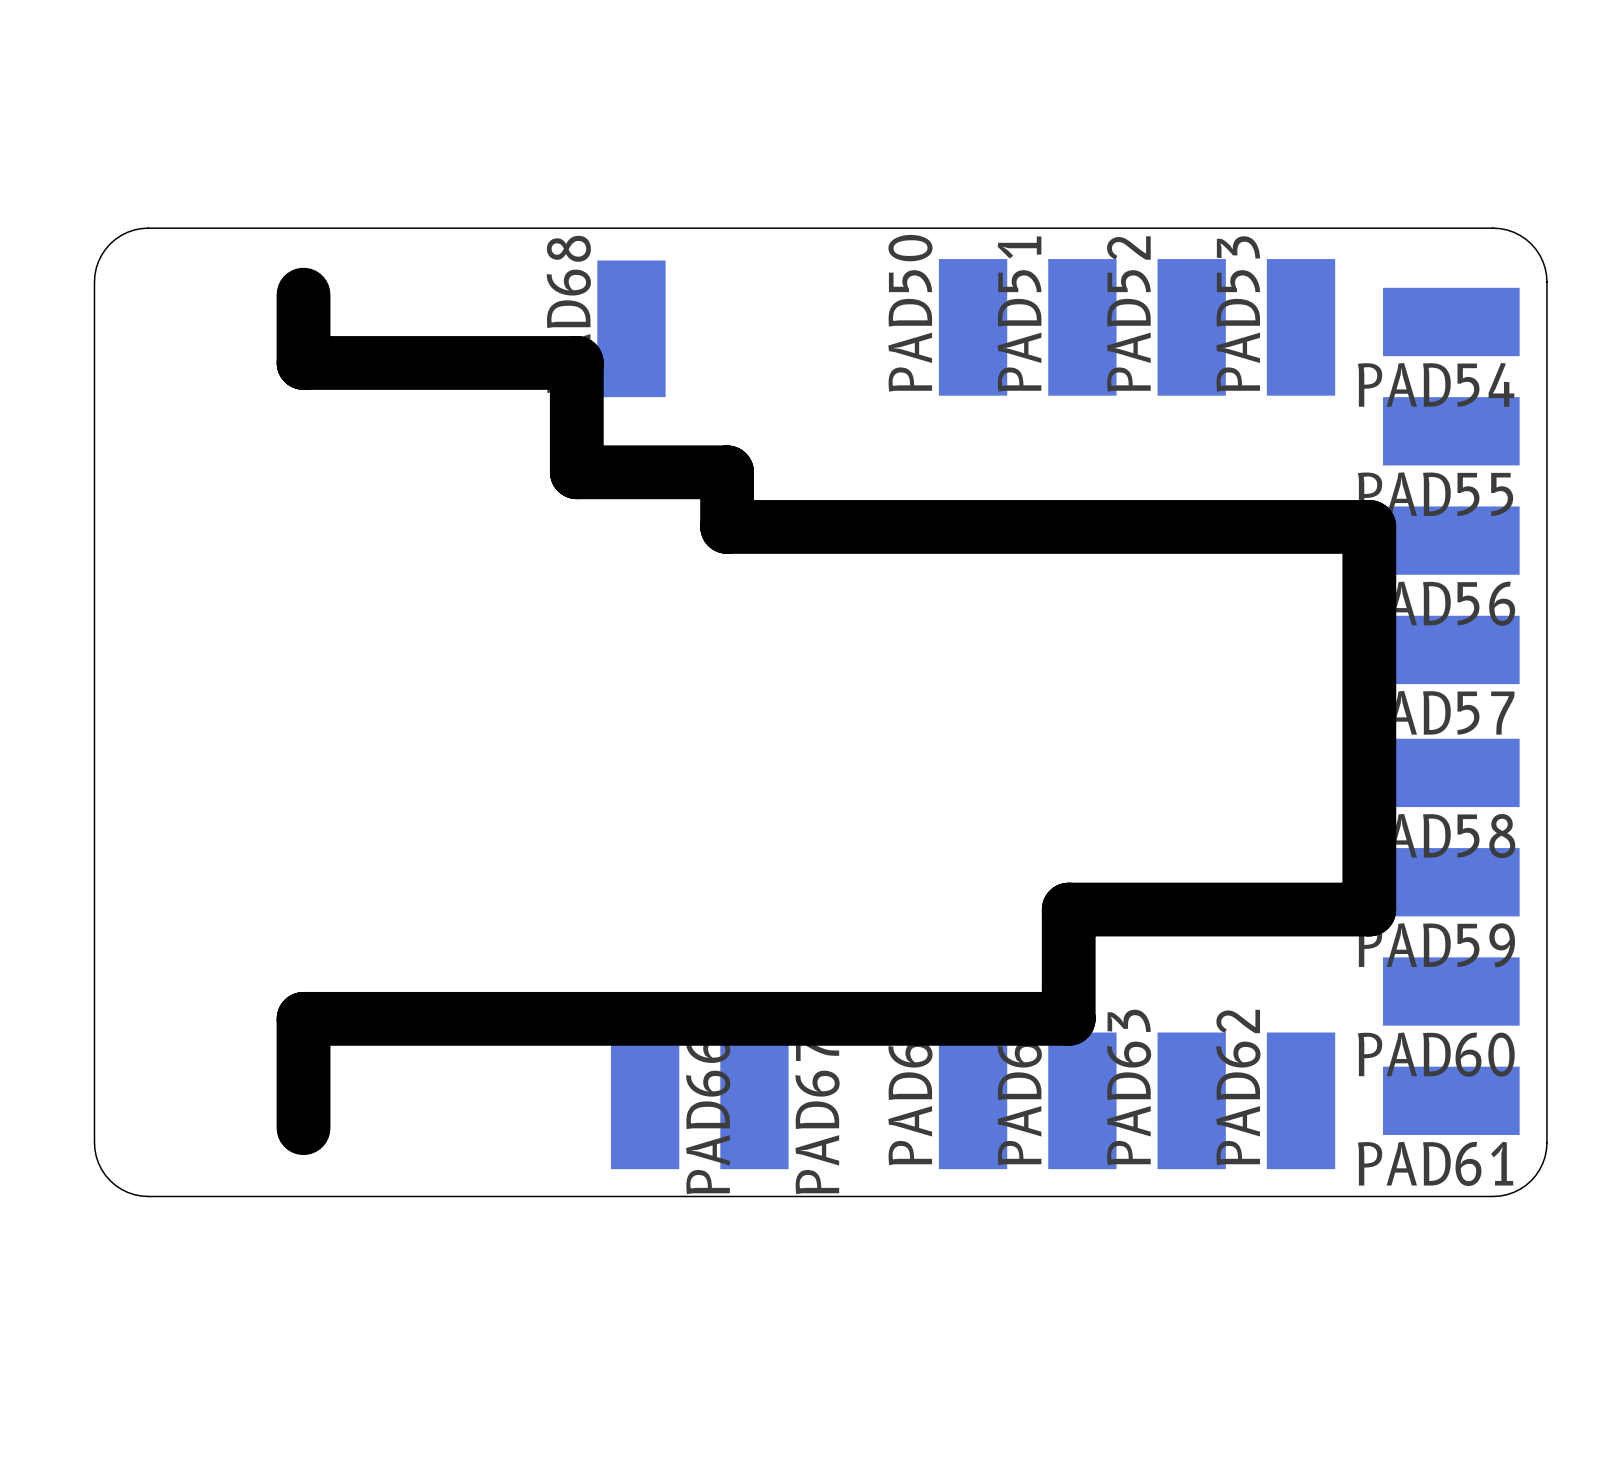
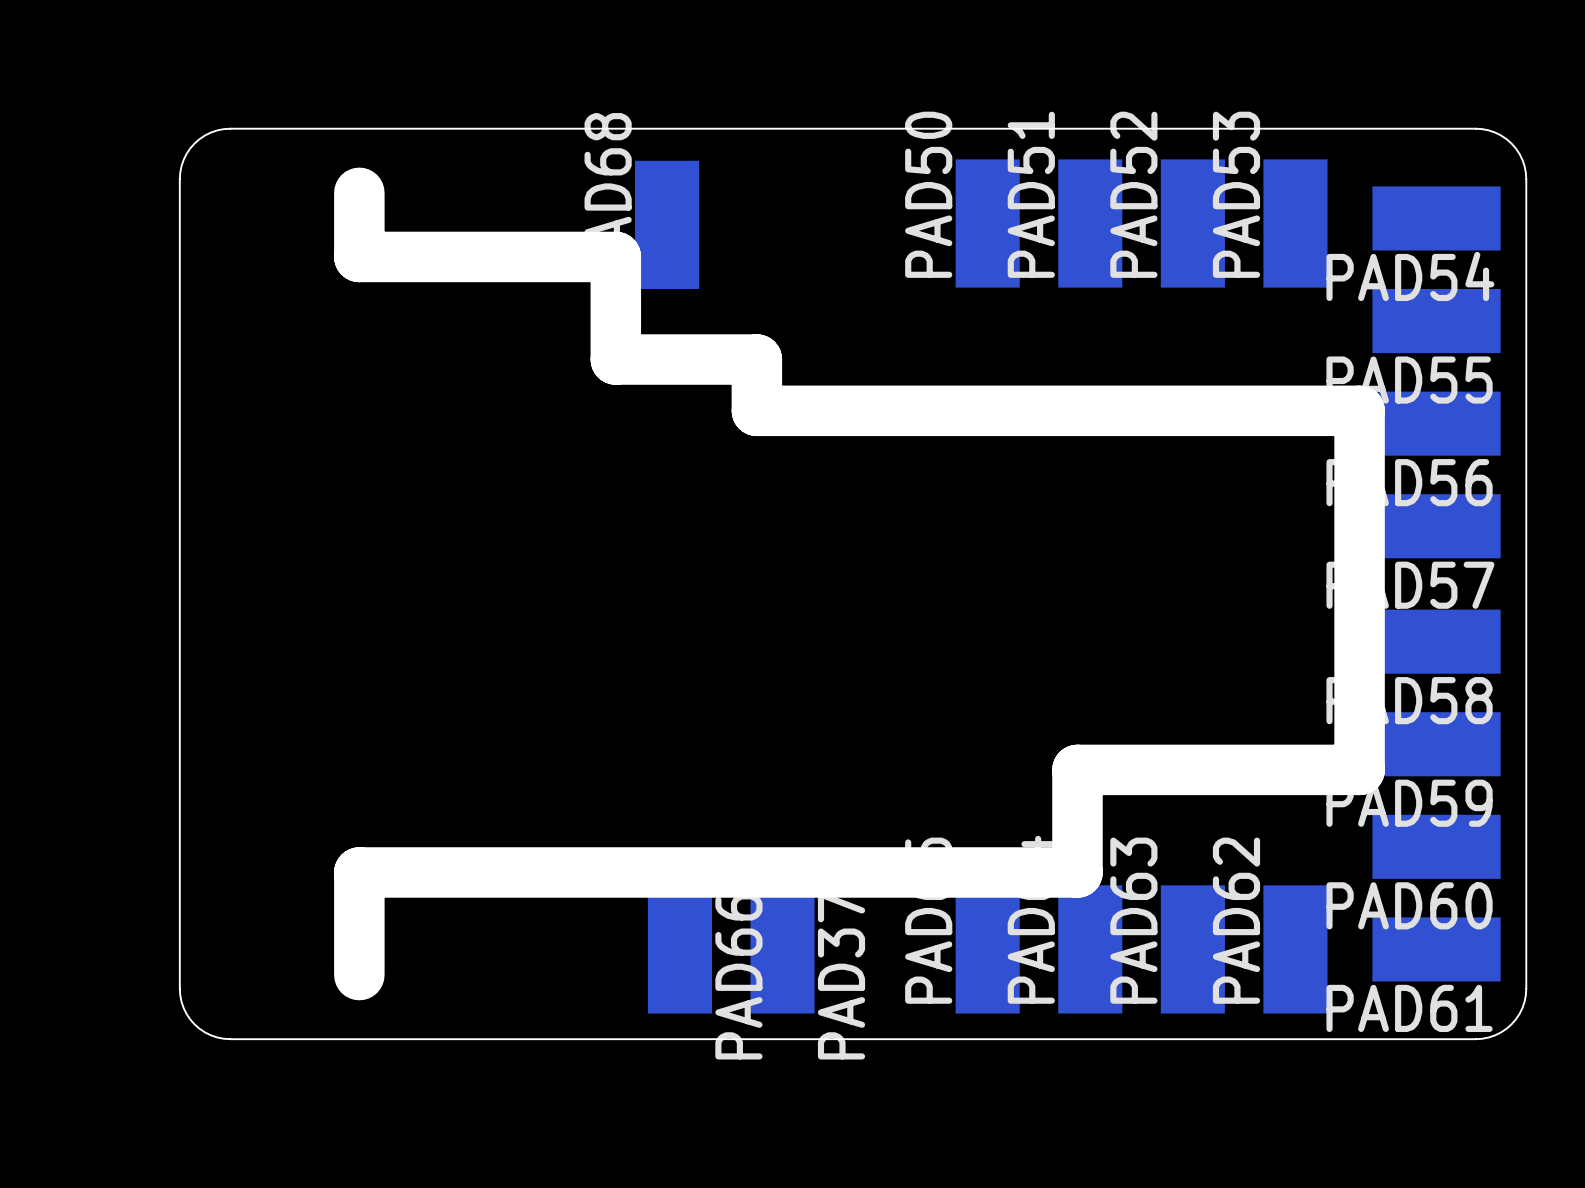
board edge: (1546, 281) (1542, 261) (1531, 243) (1513, 232) (1493, 228) (148, 228) (134, 230) (121, 235) (110, 243) (101, 255) (96, 268) (94, 281) (94, 1142) (98, 1163) (105, 1175) (115, 1185) (134, 1194) (166, 1196) -> (1526, 180) (1522, 159) (1511, 143) (1495, 132) (1475, 128) (230, 128) (217, 130) (205, 135) (194, 143) (186, 153) (181, 166) (179, 179) (179, 988) (183, 1008) (194, 1024) (210, 1035) (230, 1039)
PAD67 name: PAD67 (817, 1115) -> PAD37 (841, 975)

